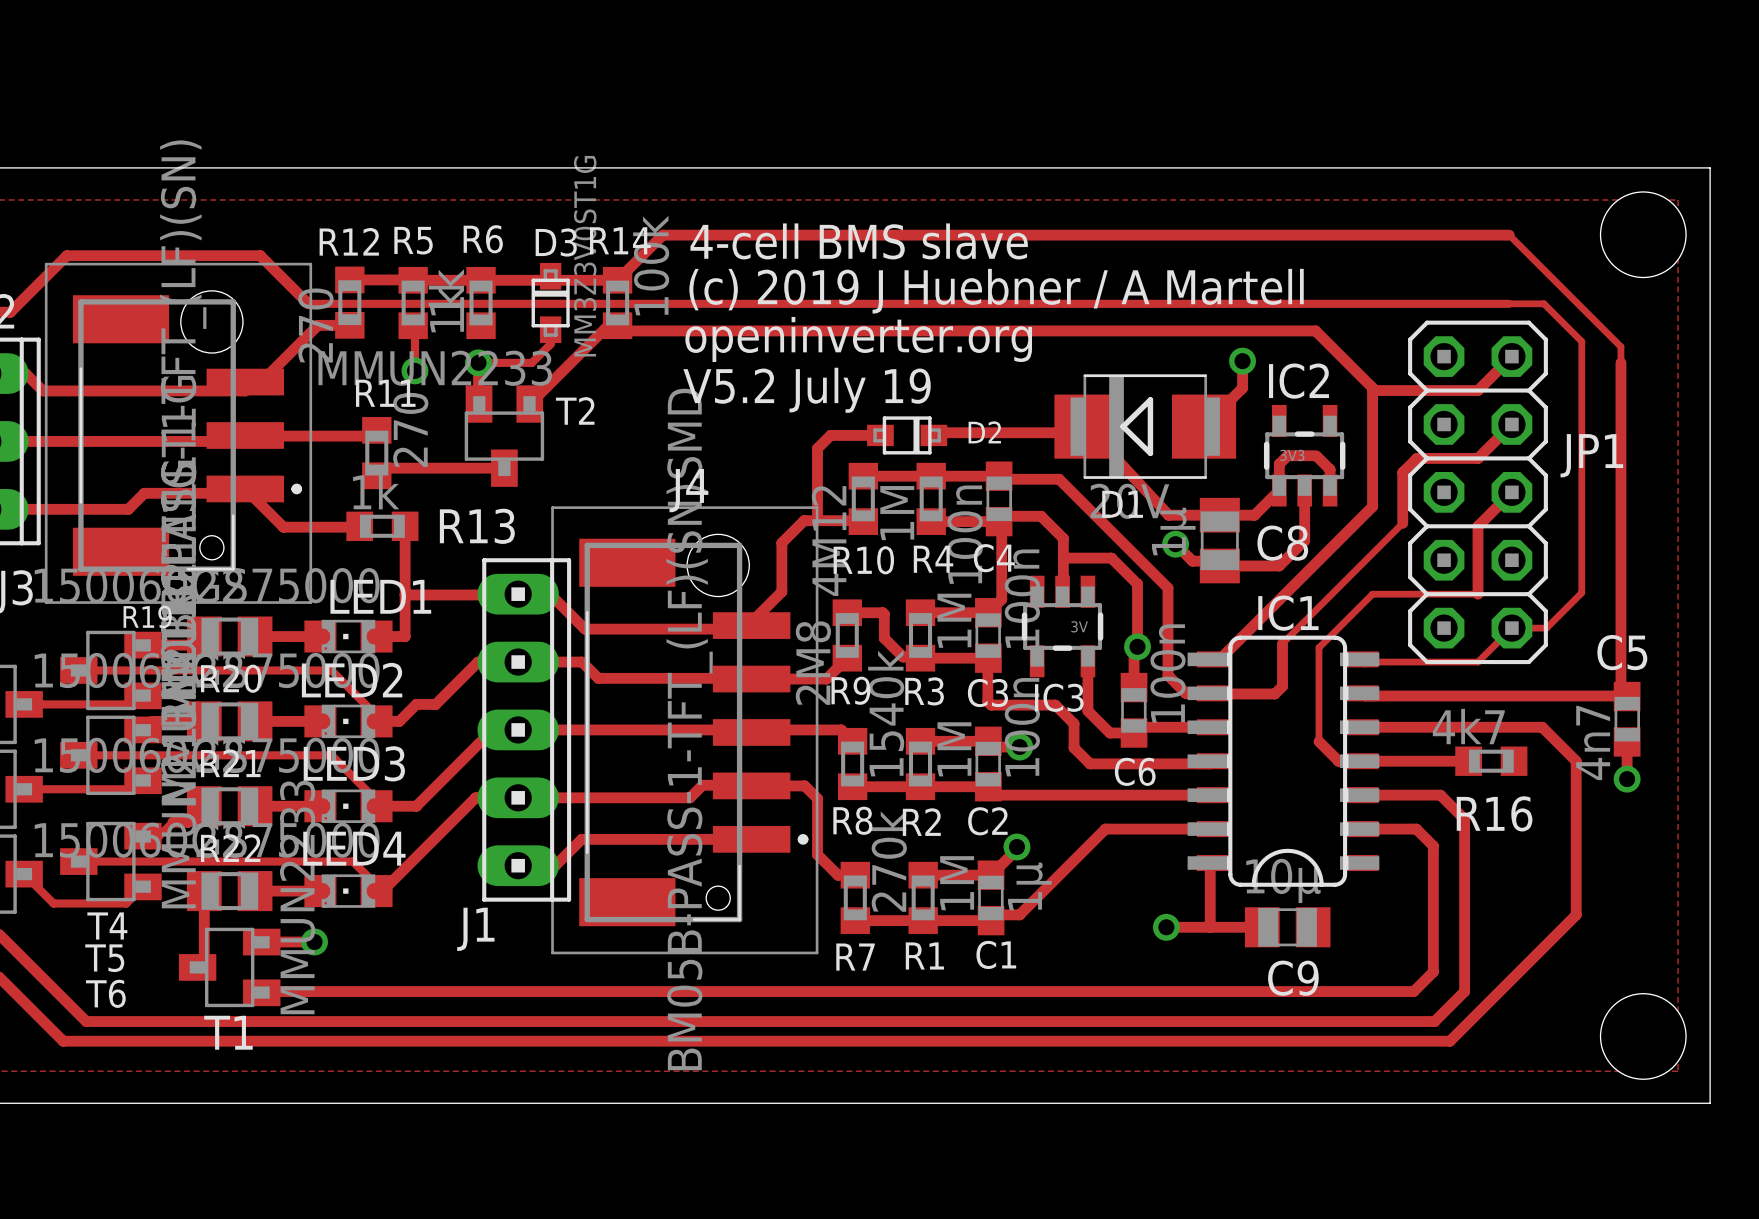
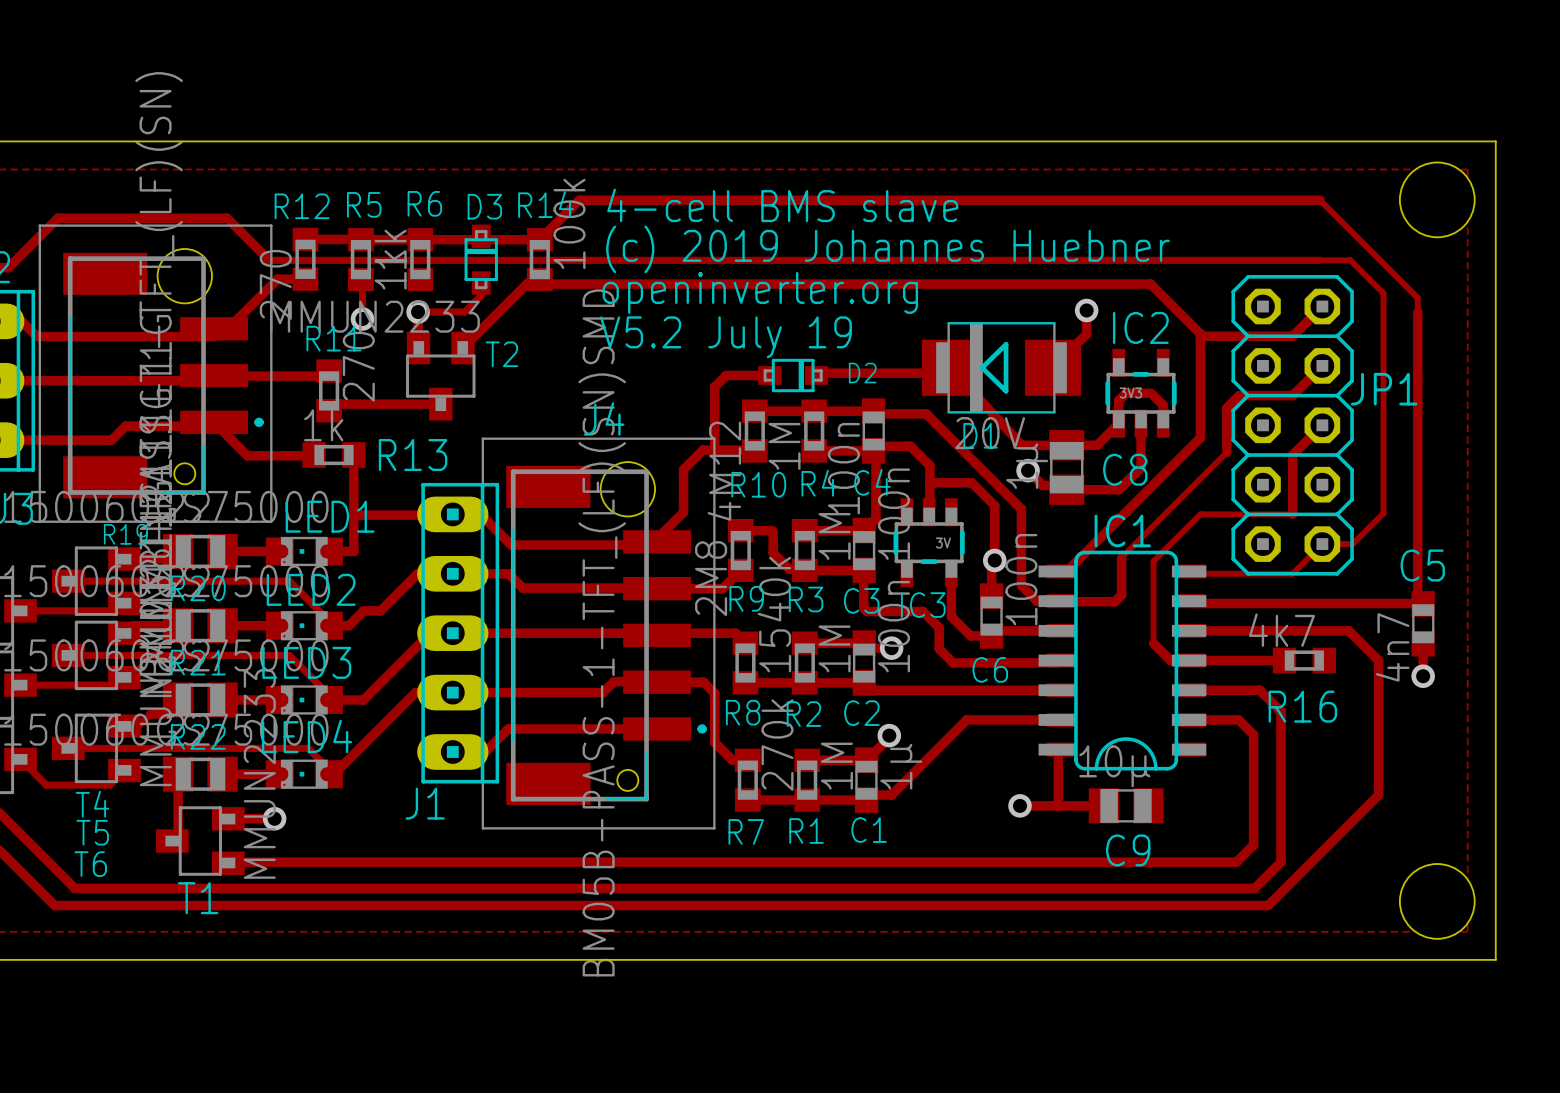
D3 value: MM3Z3V0ST1G (585, 256) -> none
text: (c) 2019 J Huebner / A Martell (996, 291) -> (c) 2019 Johannes Huebner (888, 249)

